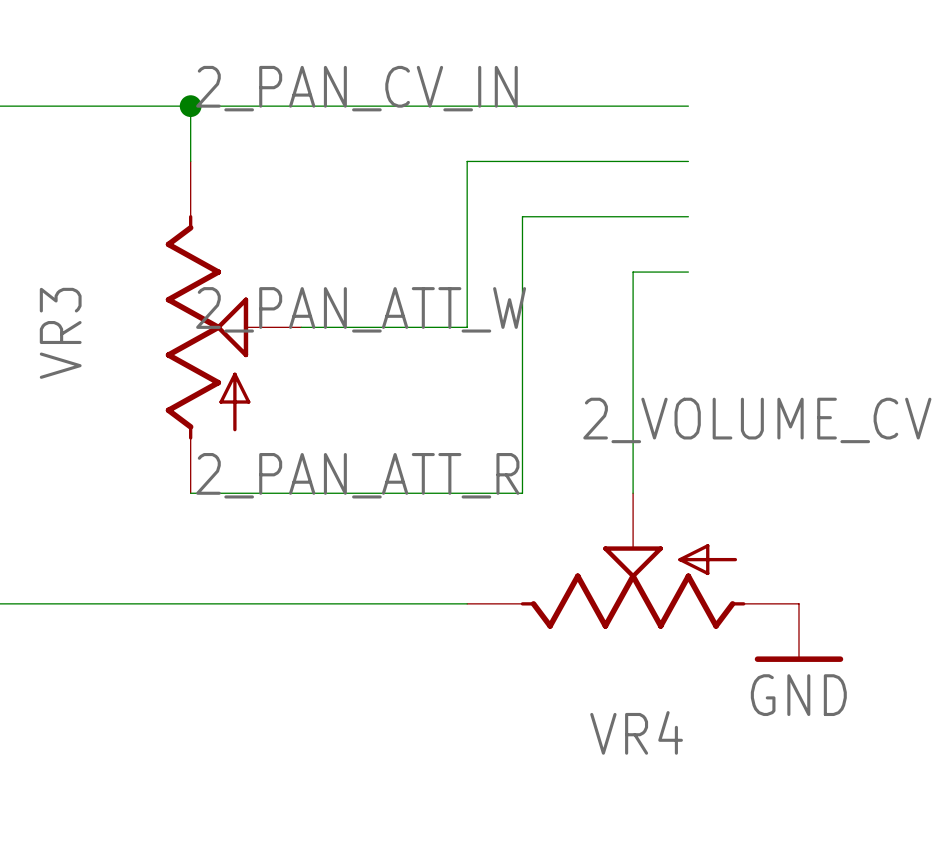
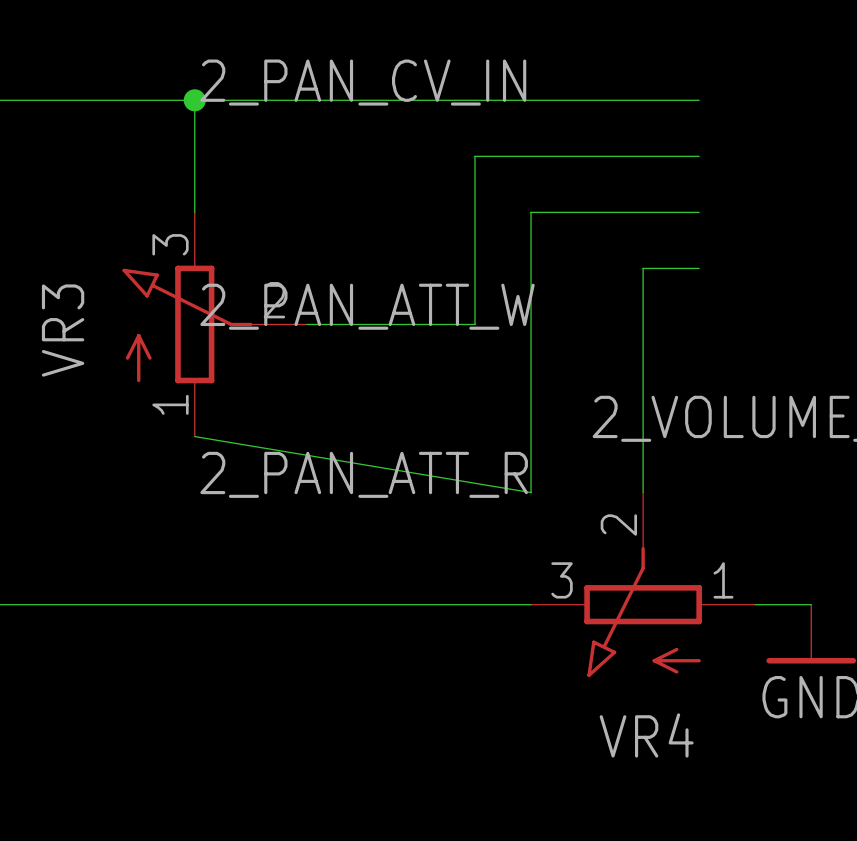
VR3 symbol: [165, 161, 302, 494] -> [122, 212, 307, 437]
wire: (190, 493) (522, 493) -> (194, 436) (531, 492)
VR4 symbol: [467, 493, 799, 629] -> [531, 492, 756, 677]

